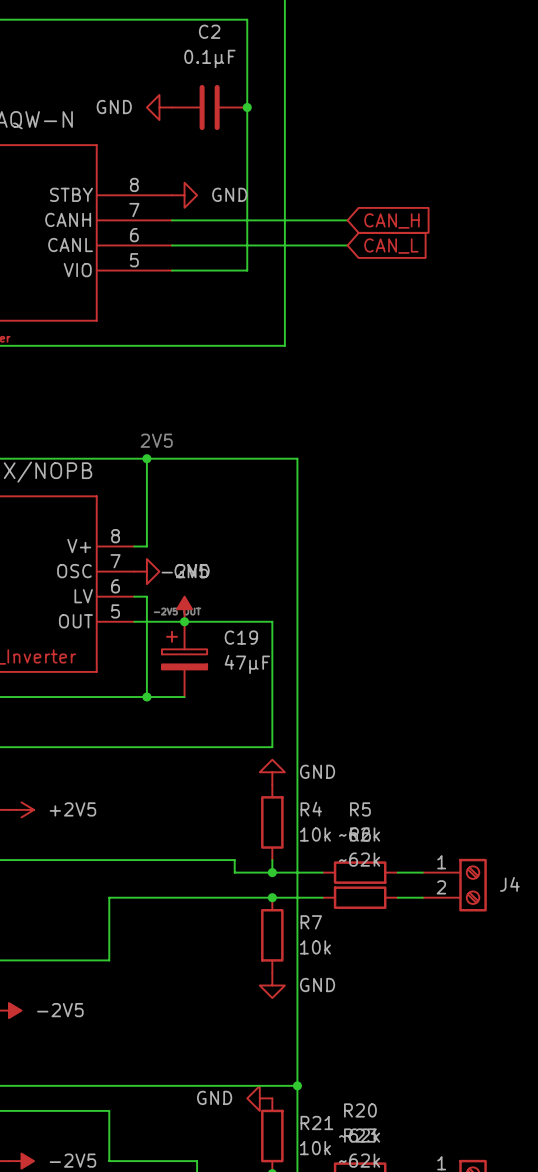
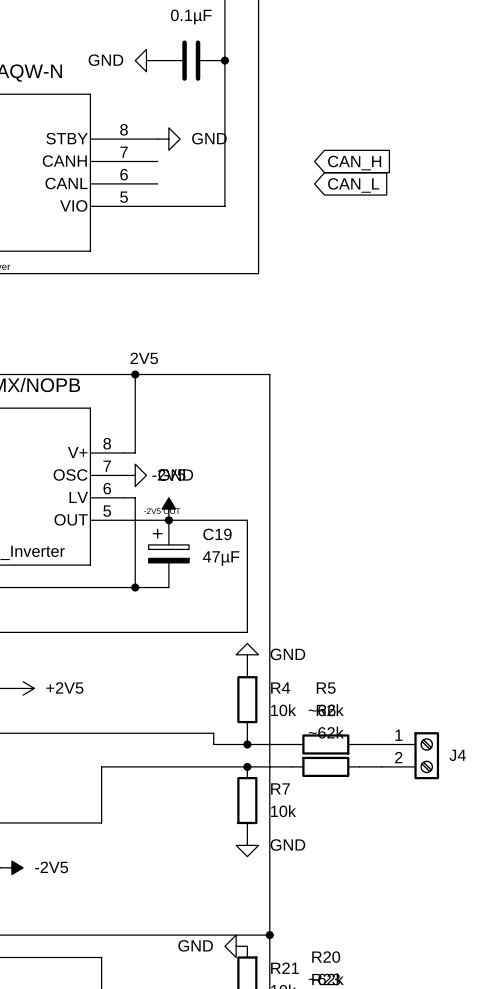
wire: (172, 220) (347, 220) -> none
wire: (172, 245) (347, 245) -> none

